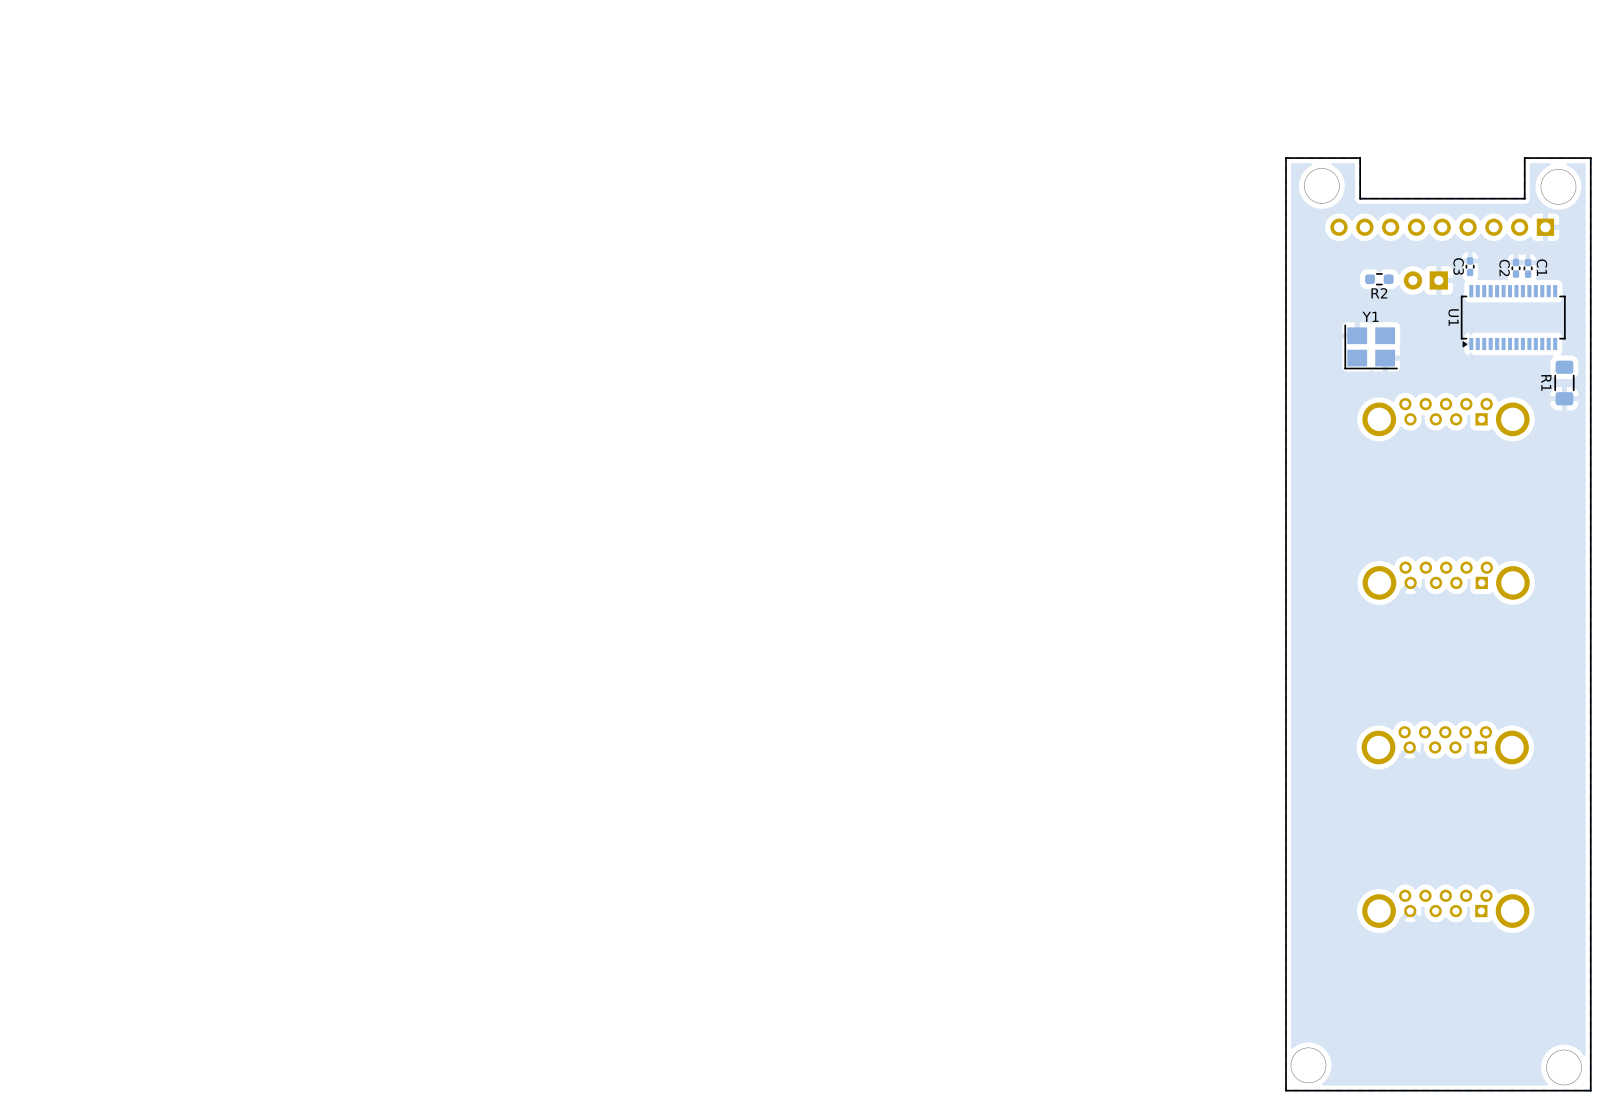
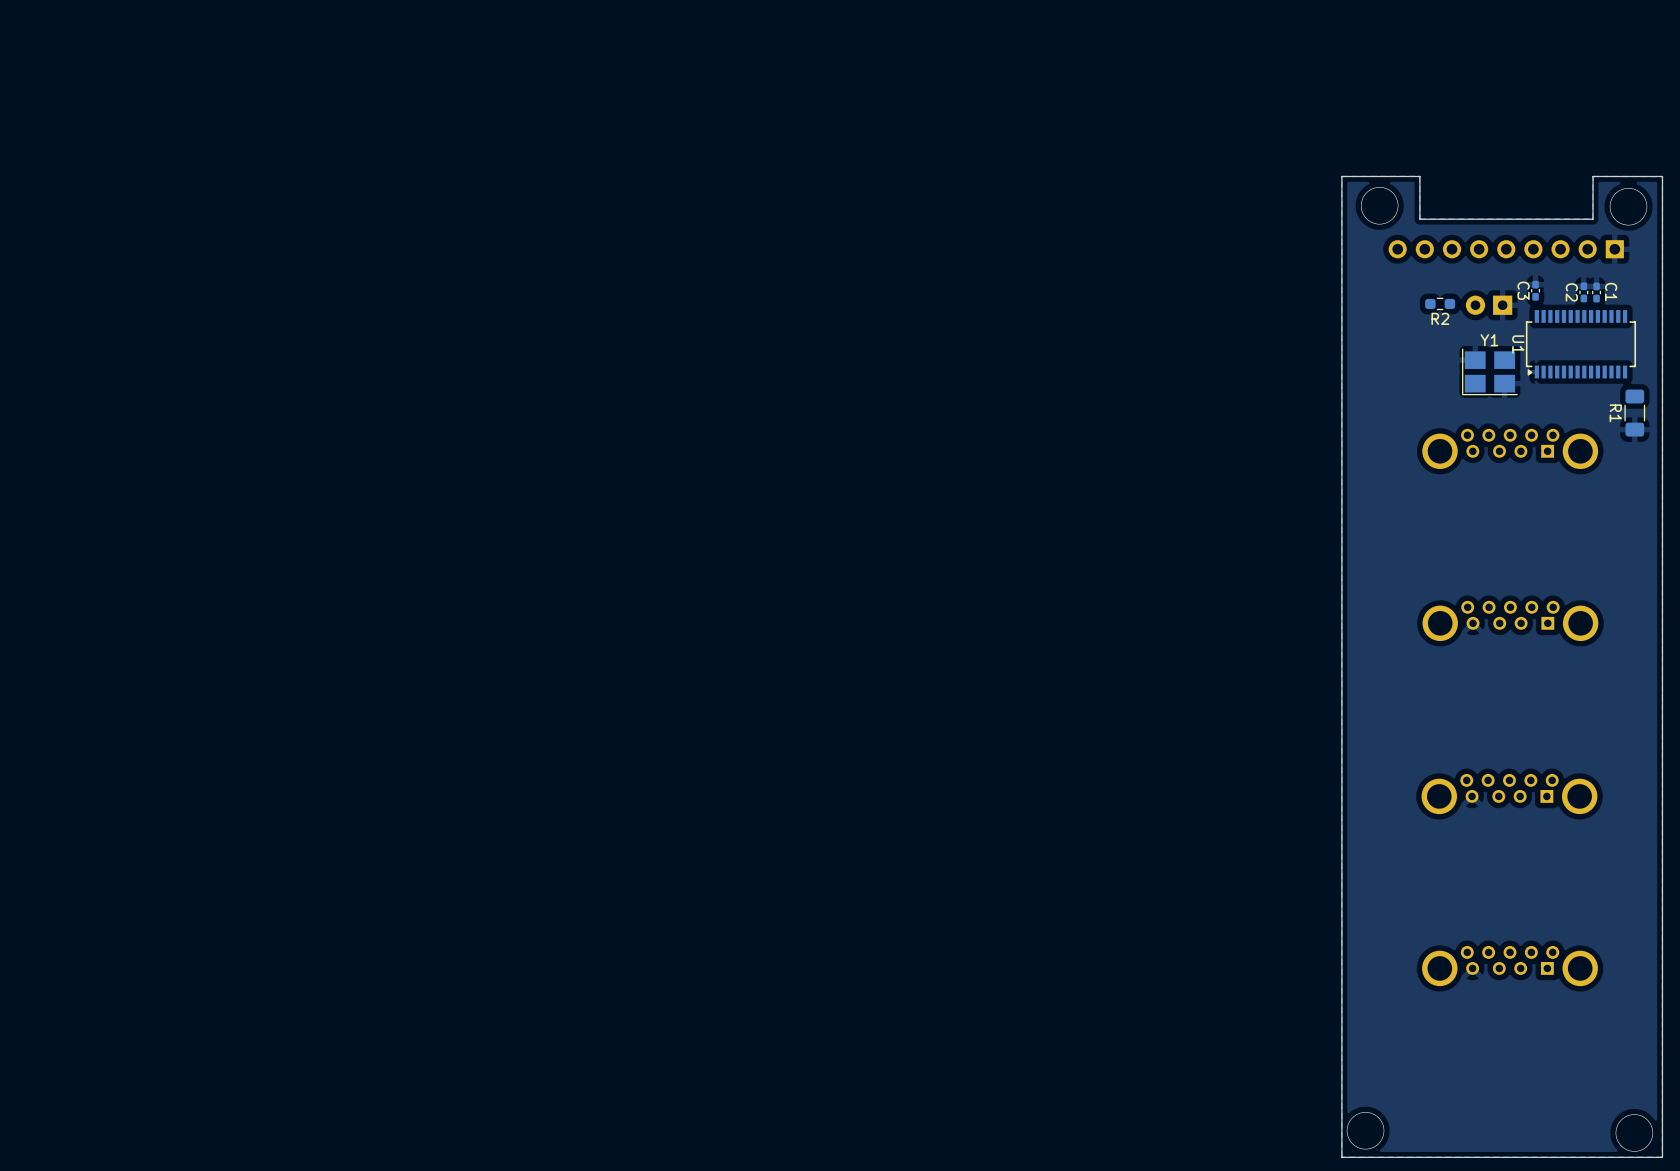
Y1 position: (1371, 346) -> (1489, 371)

